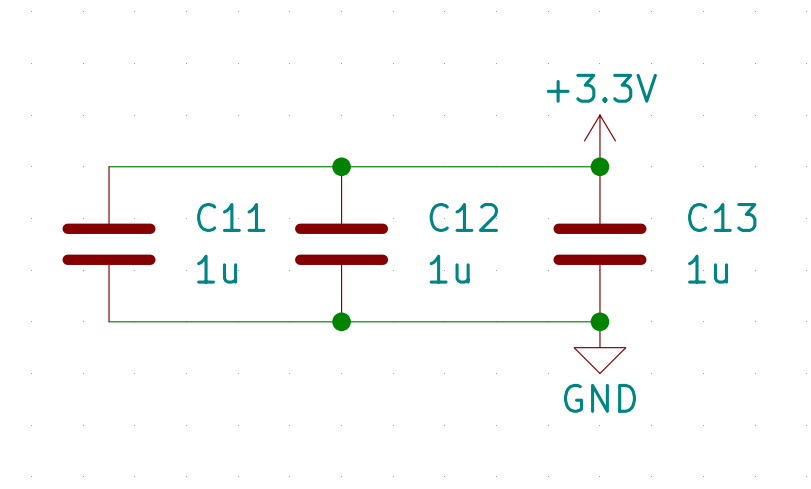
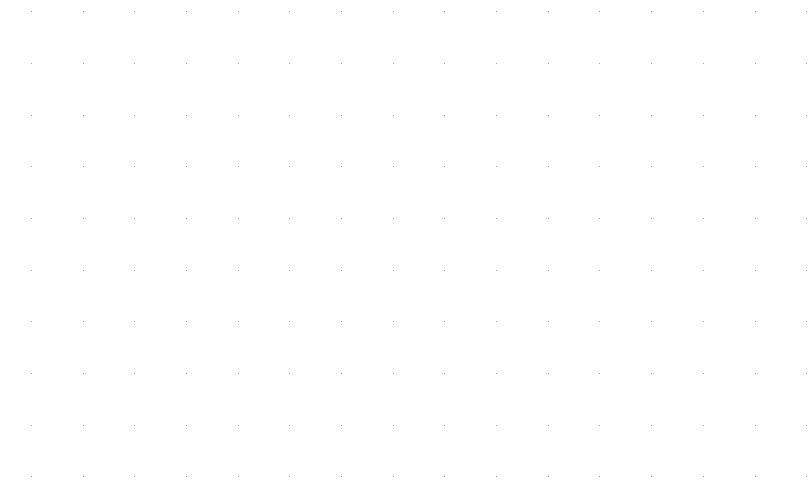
power symbol: +3.3V (599, 140) -> none
wire: (109, 166) (599, 166) -> none
junction: (341, 166) -> none
junction: (599, 166) -> none
C11: 1u (109, 244) -> none
C12: 1u (341, 244) -> none
C13: 1u (599, 244) -> none
wire: (109, 321) (599, 321) -> none
junction: (341, 321) -> none
junction: (599, 321) -> none
power symbol: GND (599, 347) -> none

